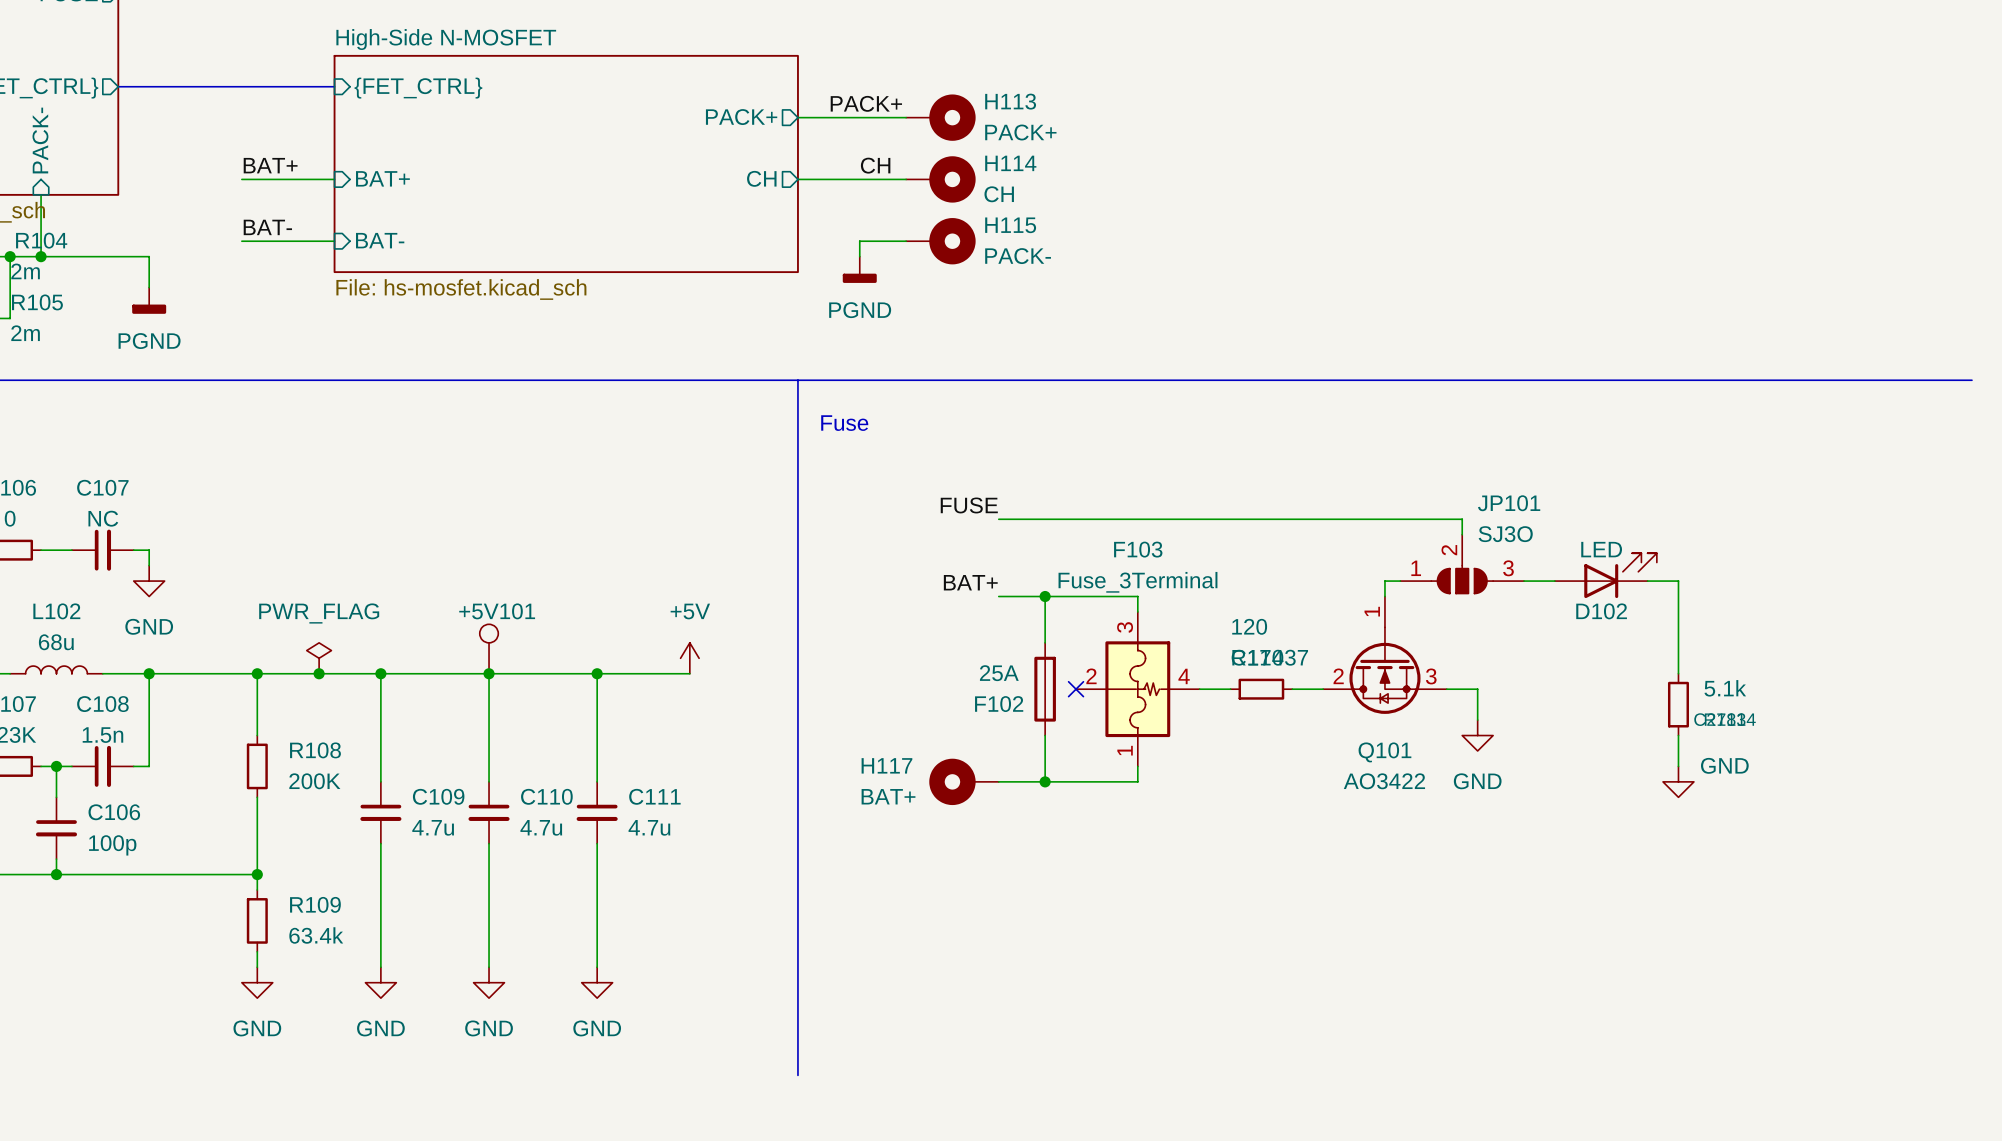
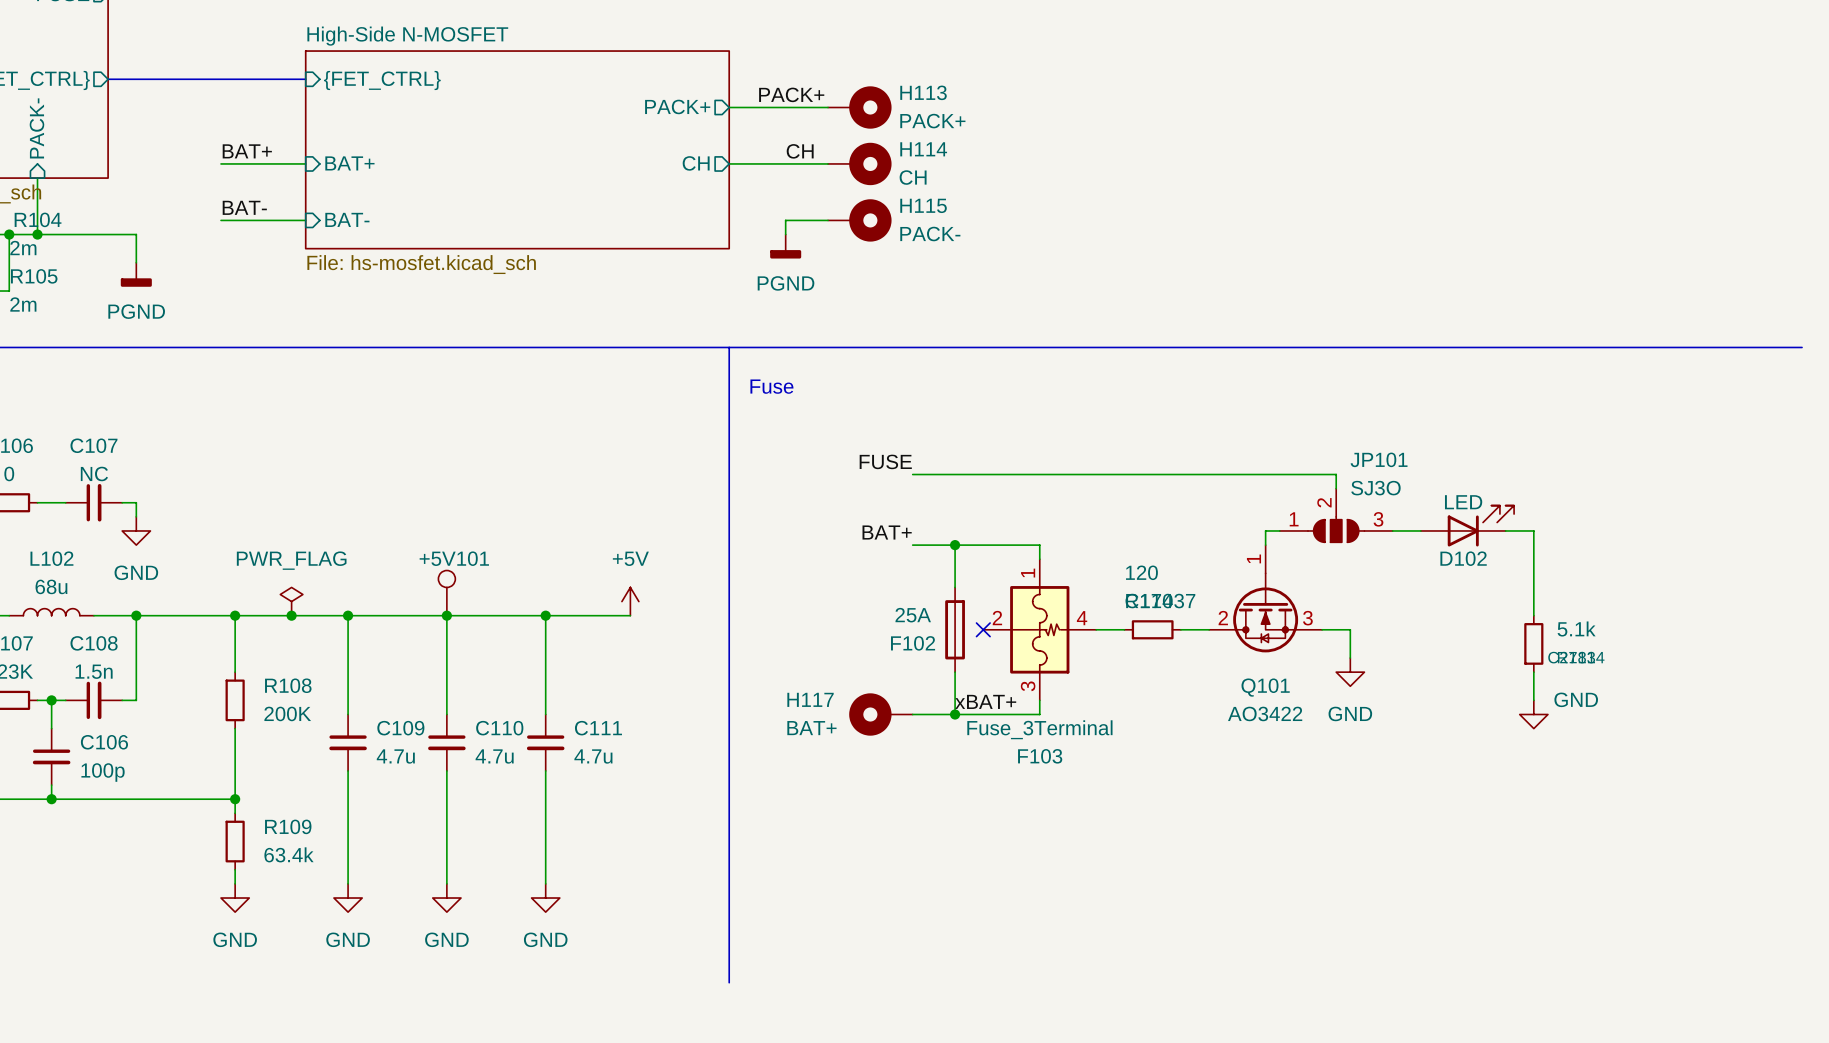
F103 flip: as is (1137, 689) -> up-down (1039, 629)
label: none -> xBAT+ (985, 701)

